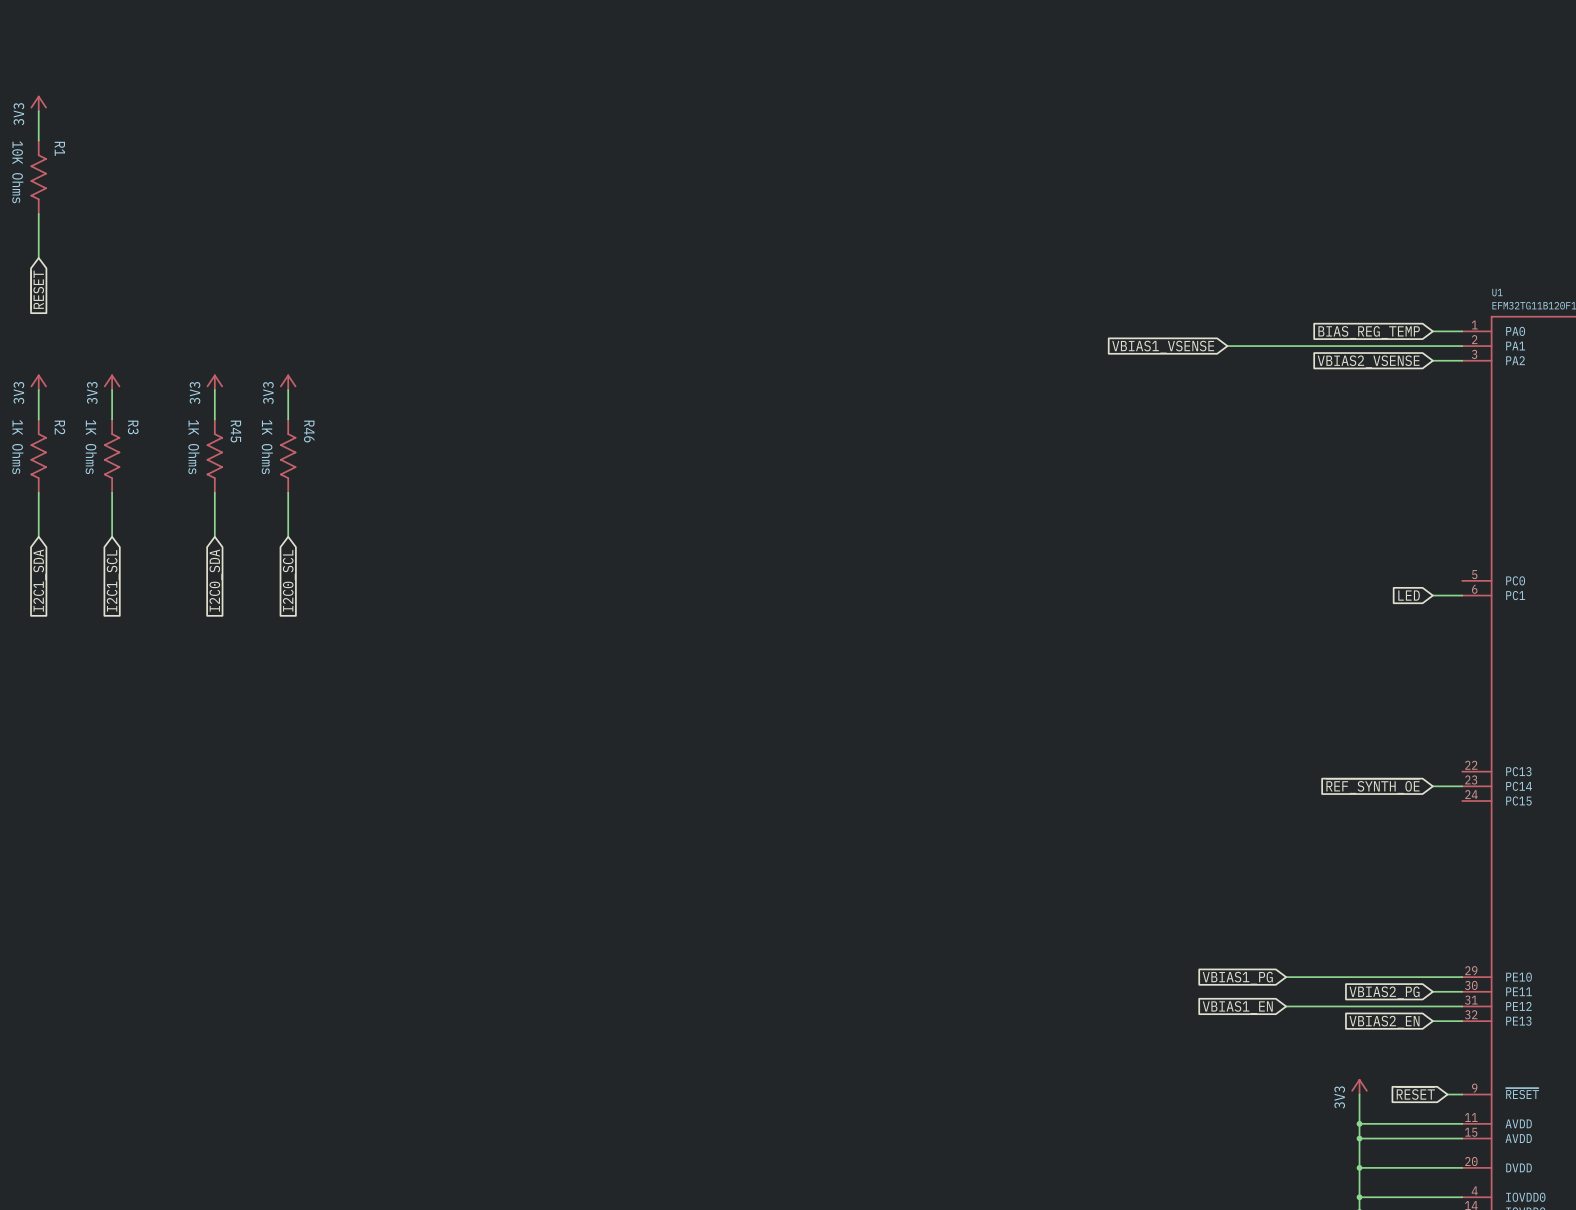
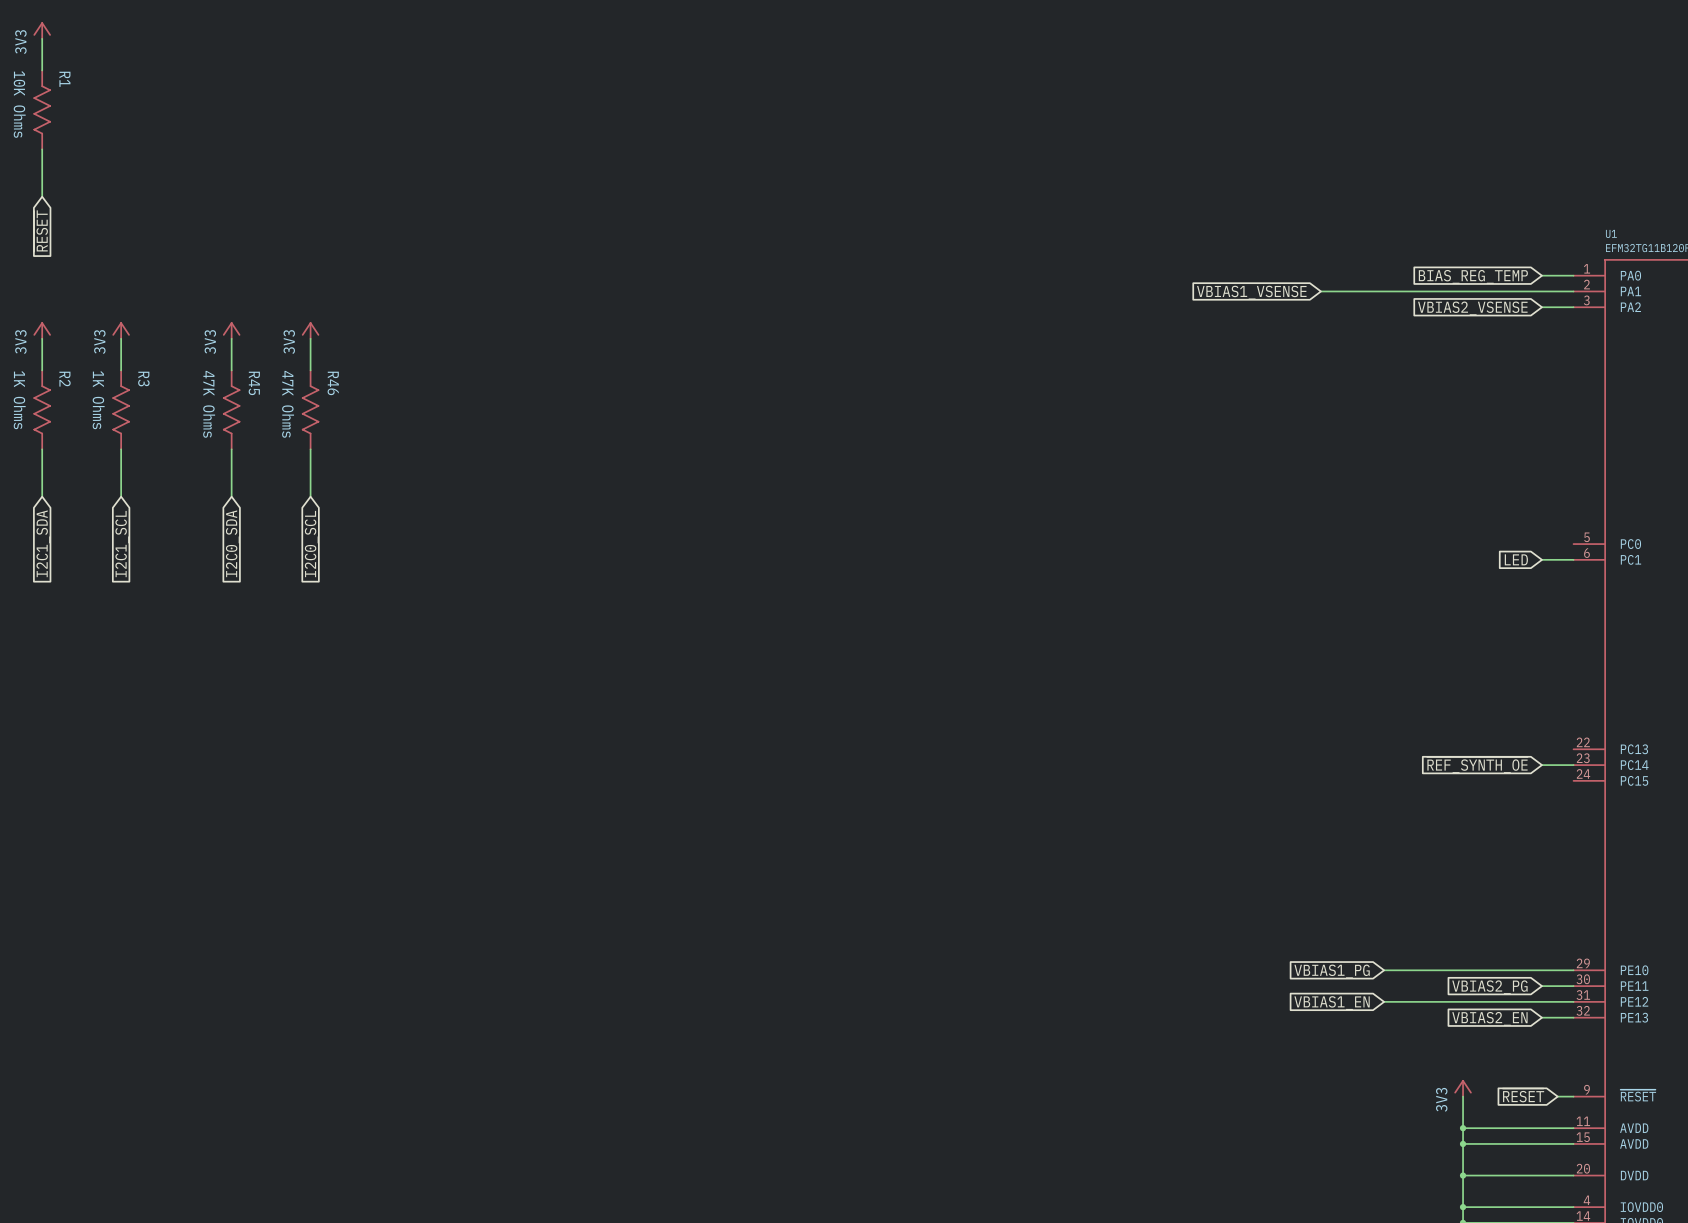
R45 value: 1K Ohms (193, 447) -> 47K Ohms (209, 404)
R46 value: 1K Ohms (267, 447) -> 47K Ohms (288, 404)

